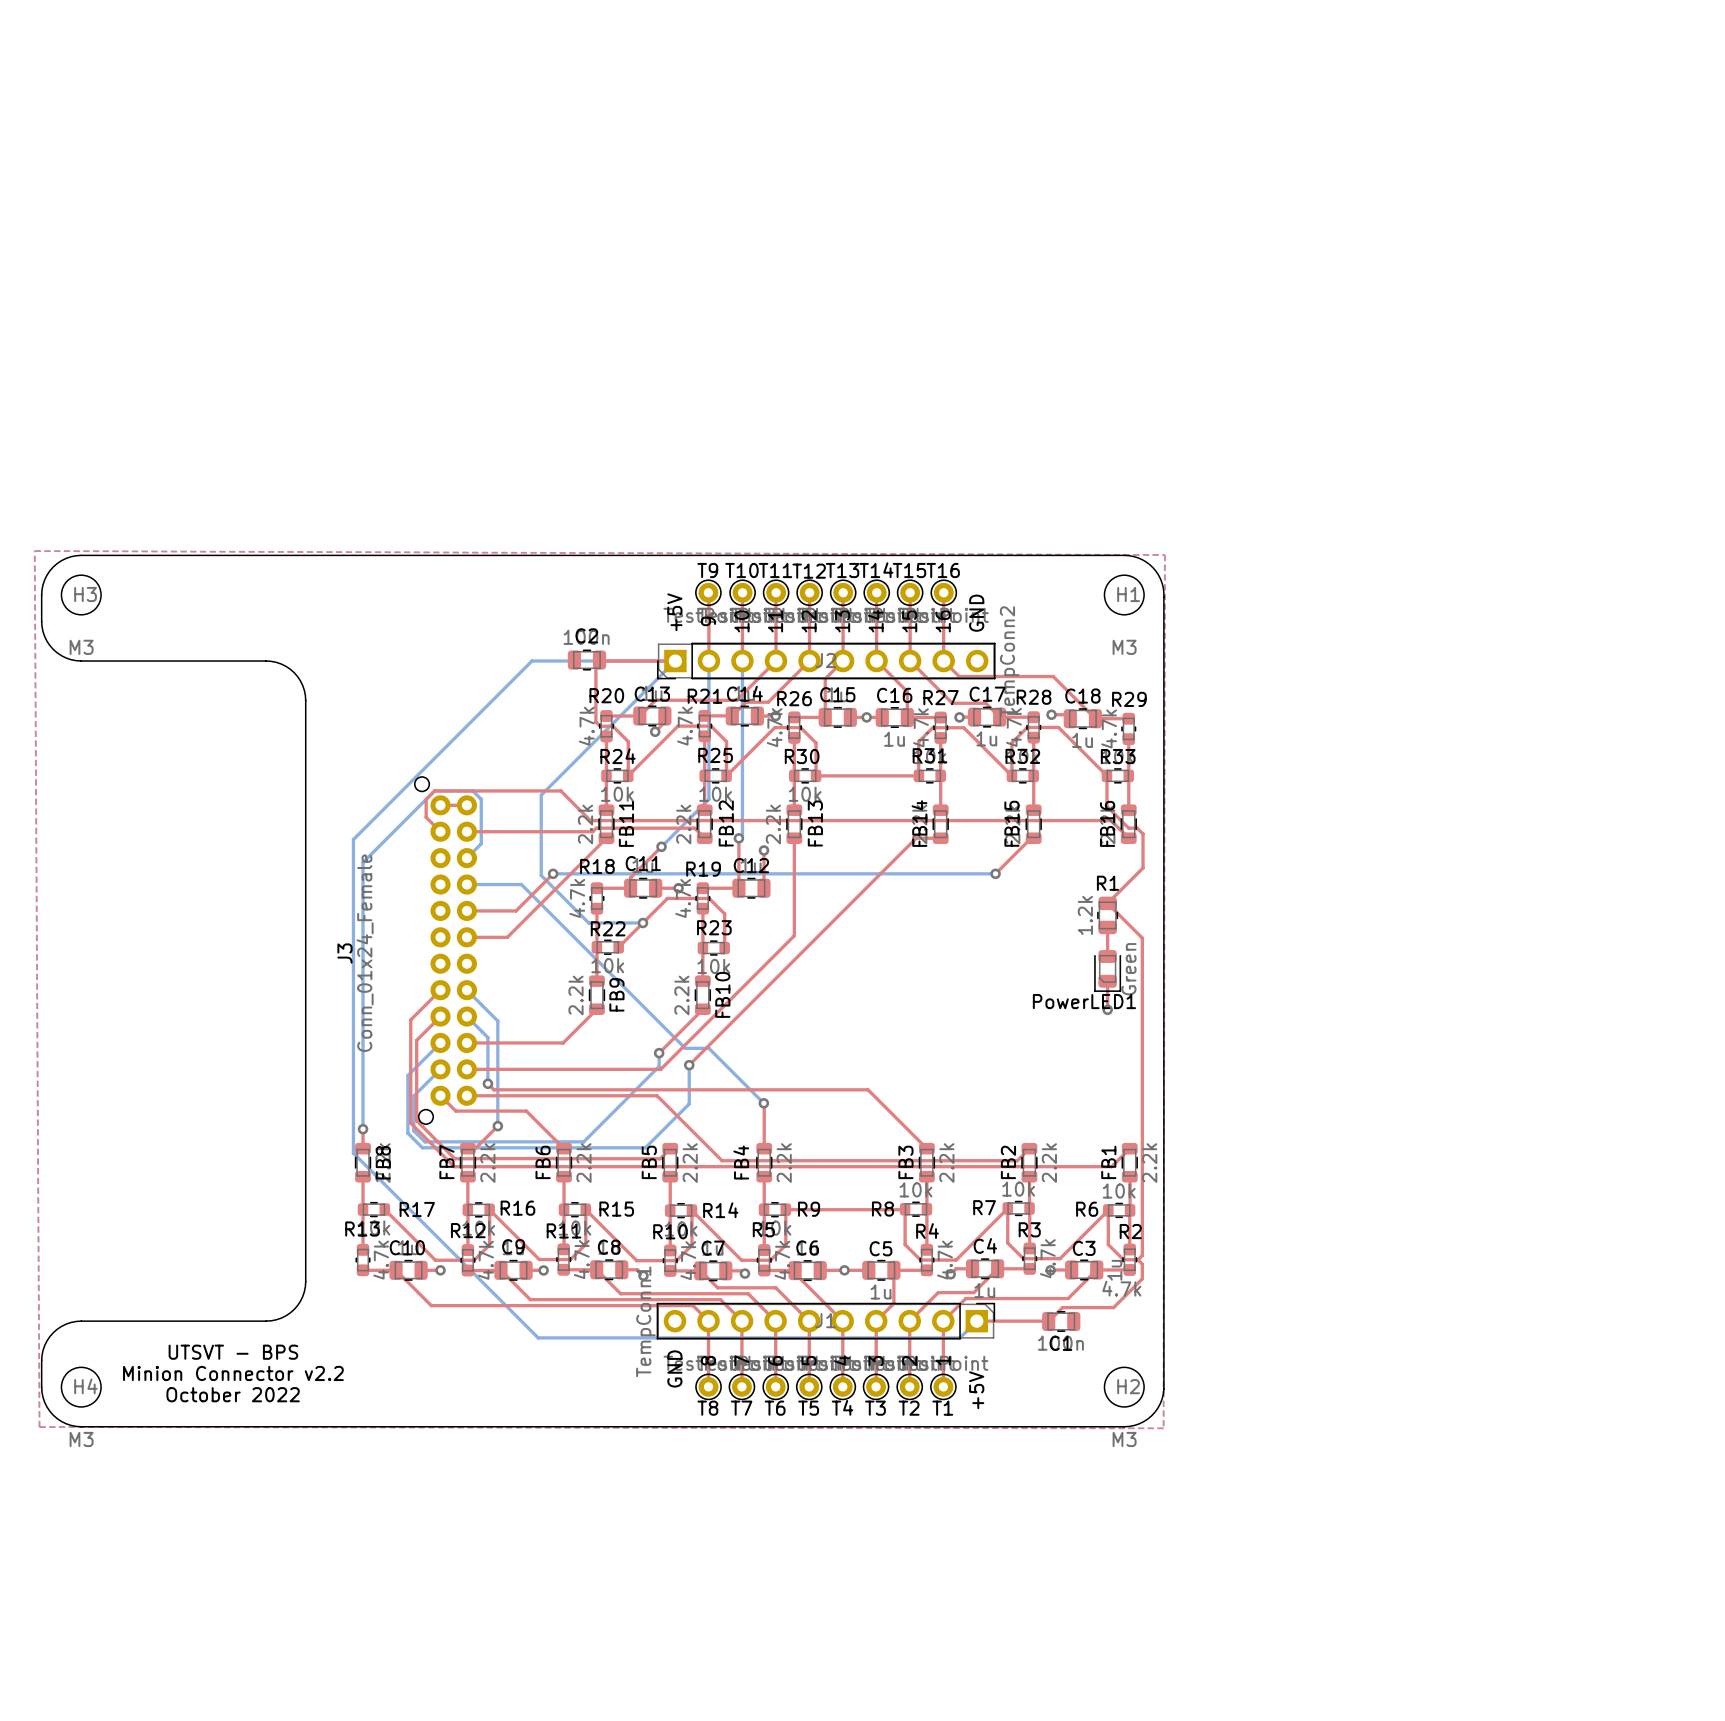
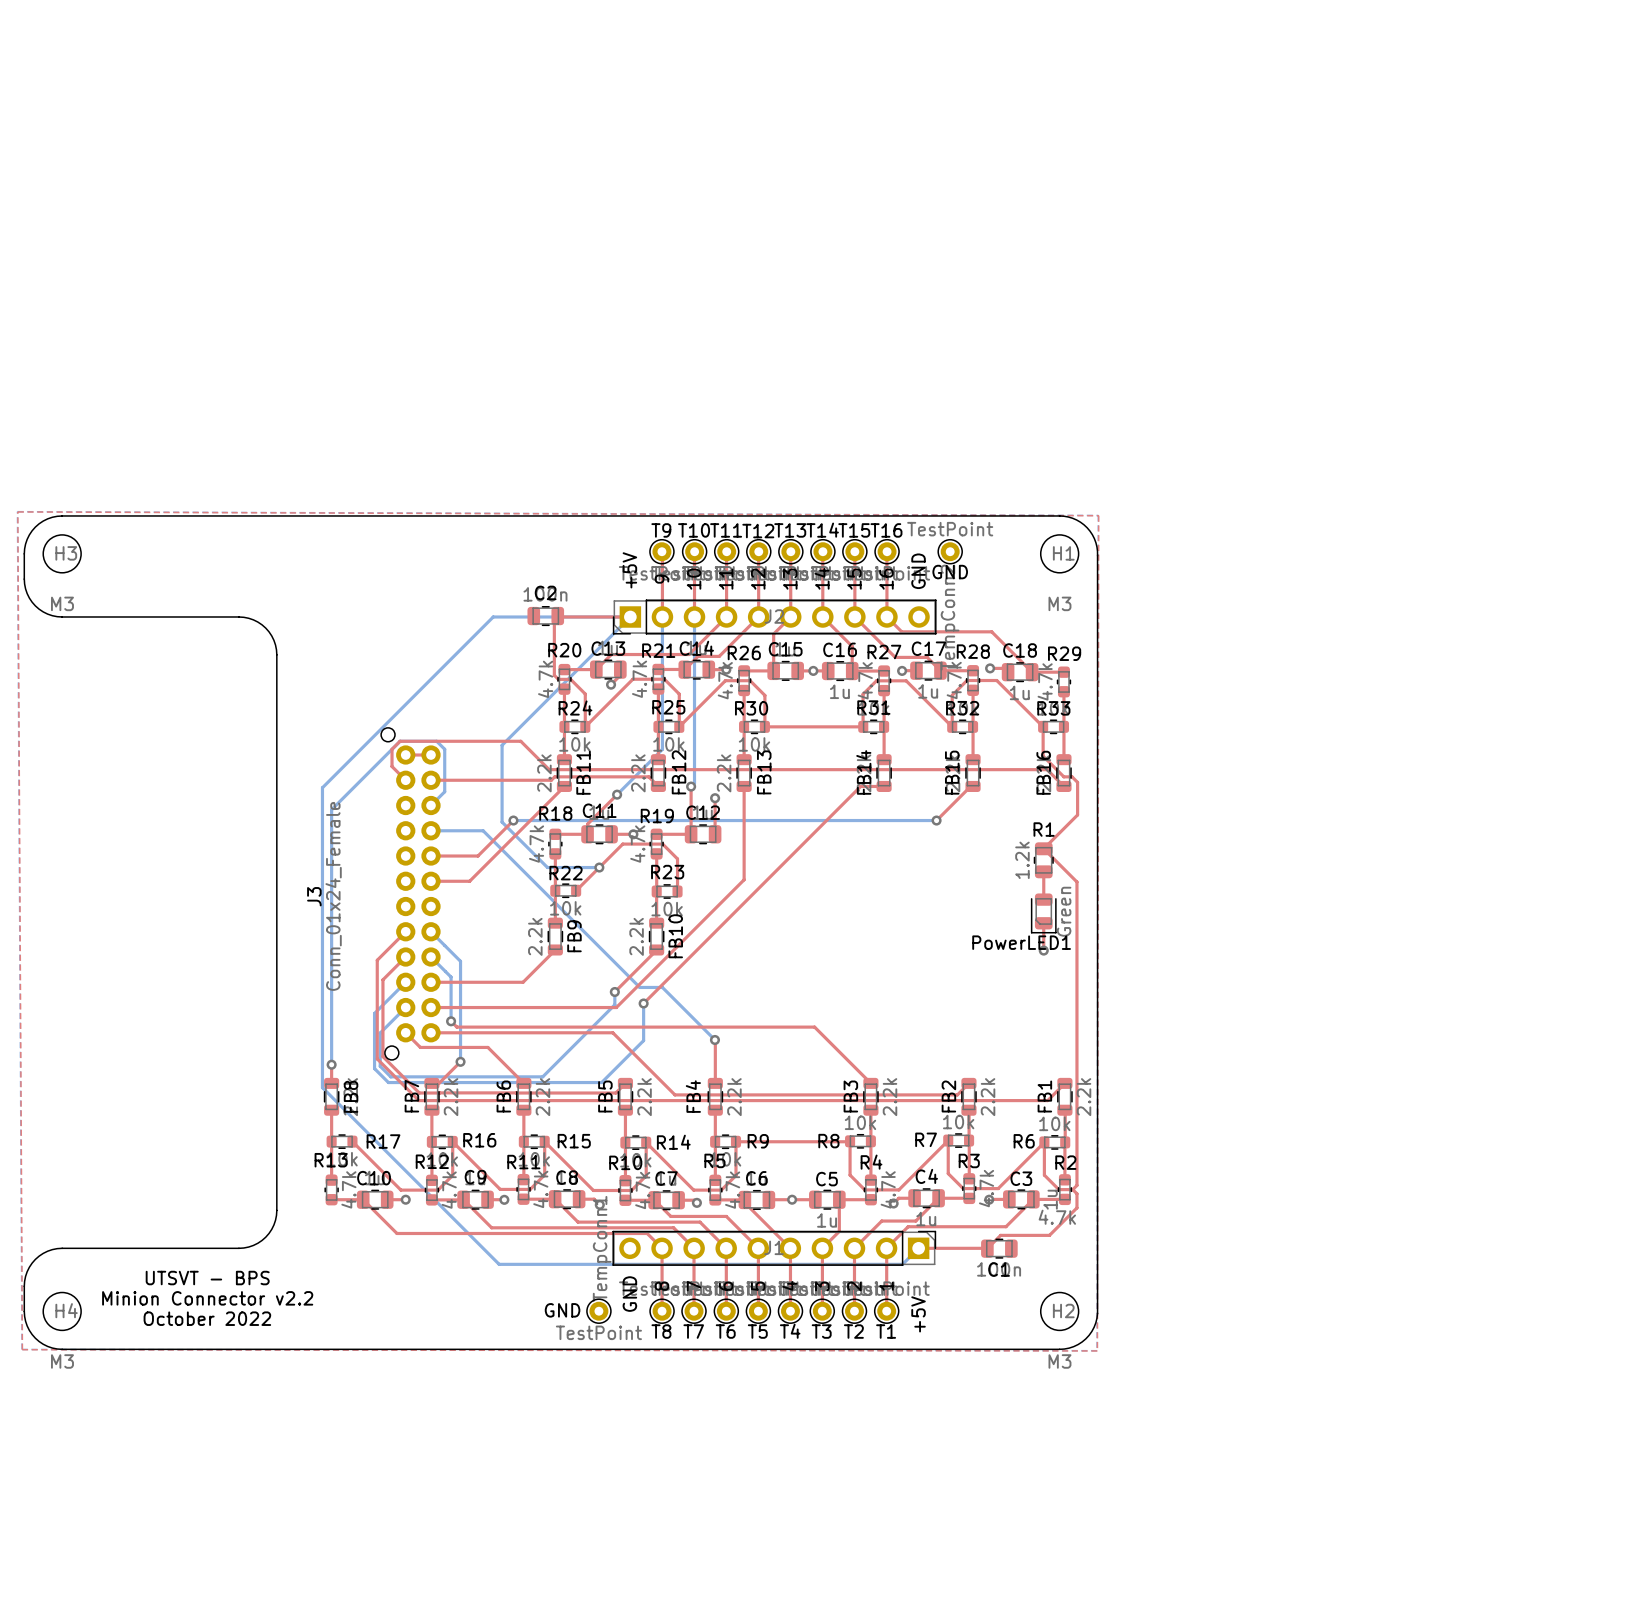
GND: none -> TestPoint (950, 551)
GND: none -> TestPoint (598, 1311)

